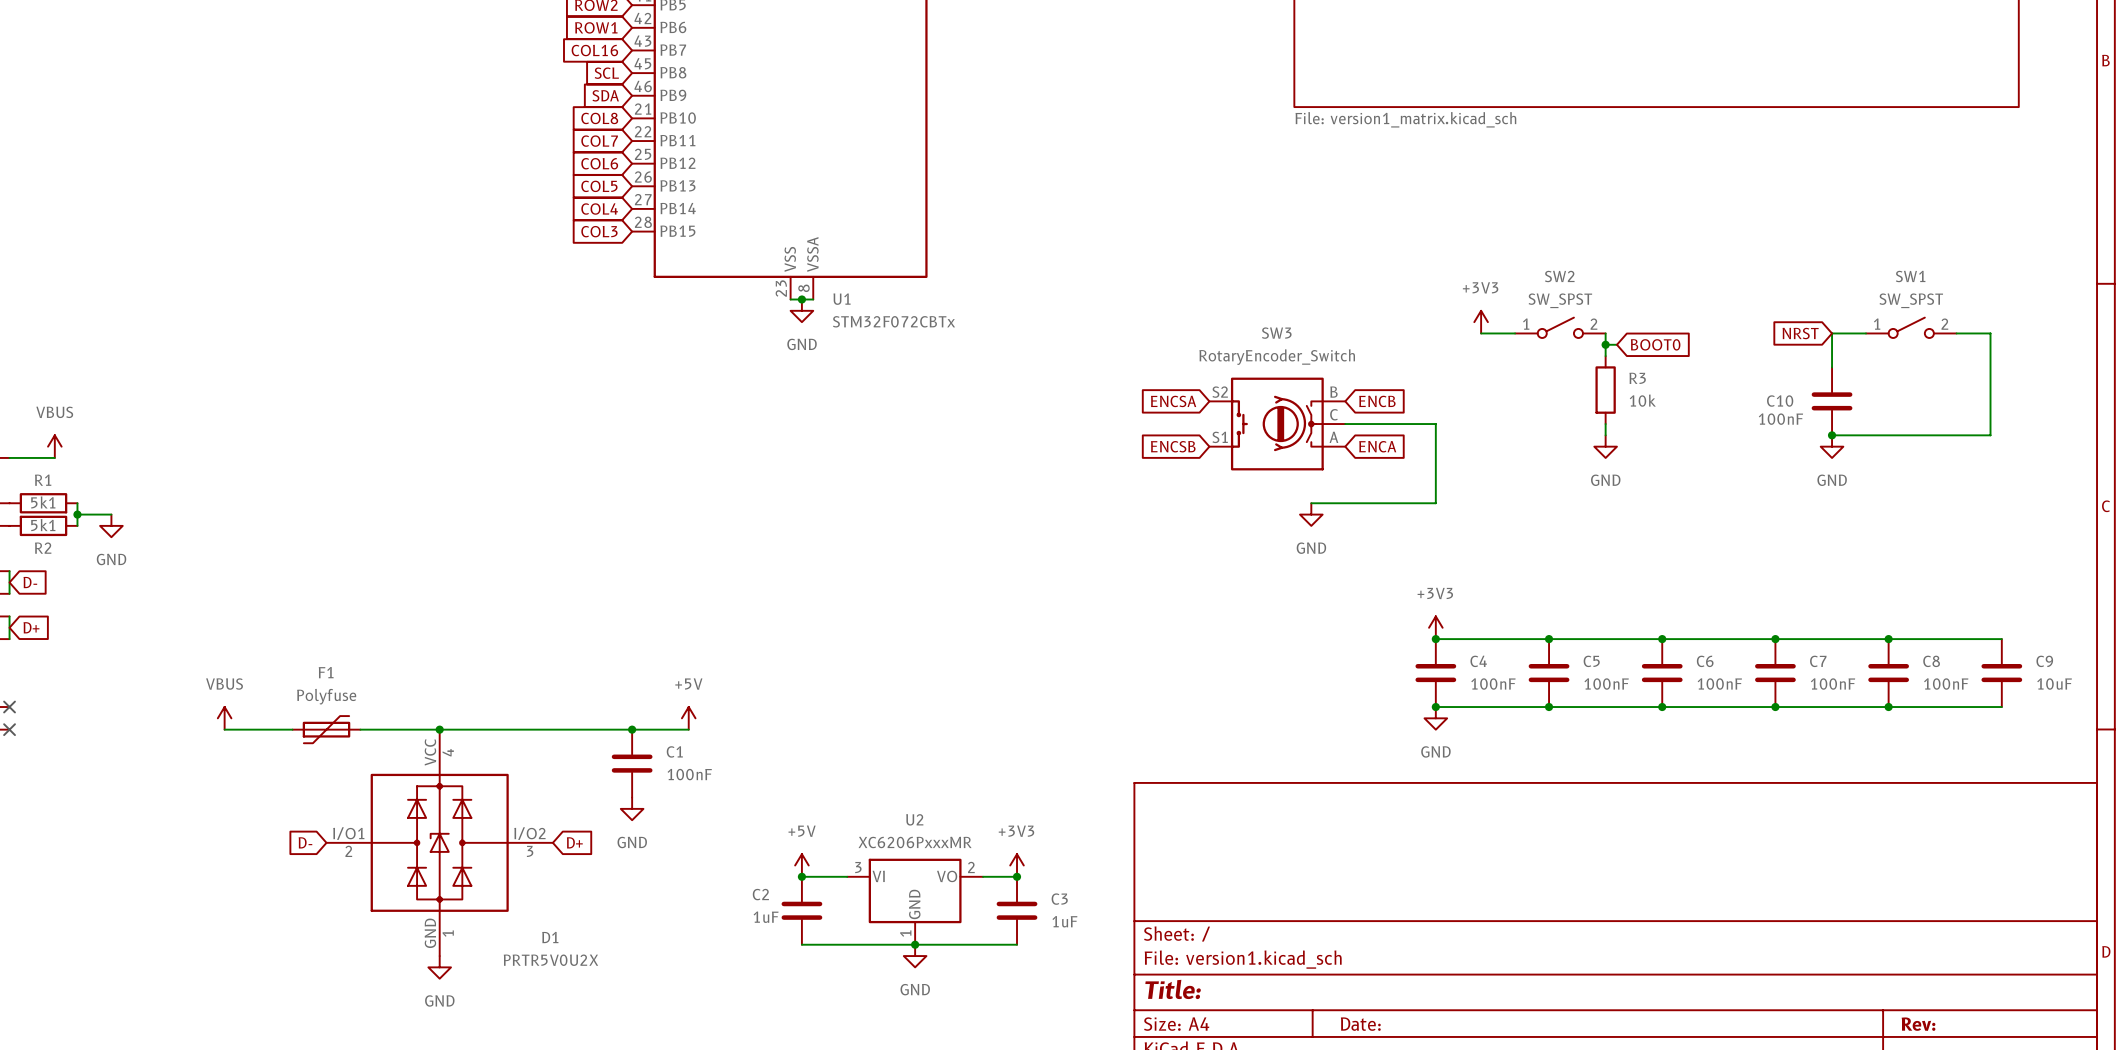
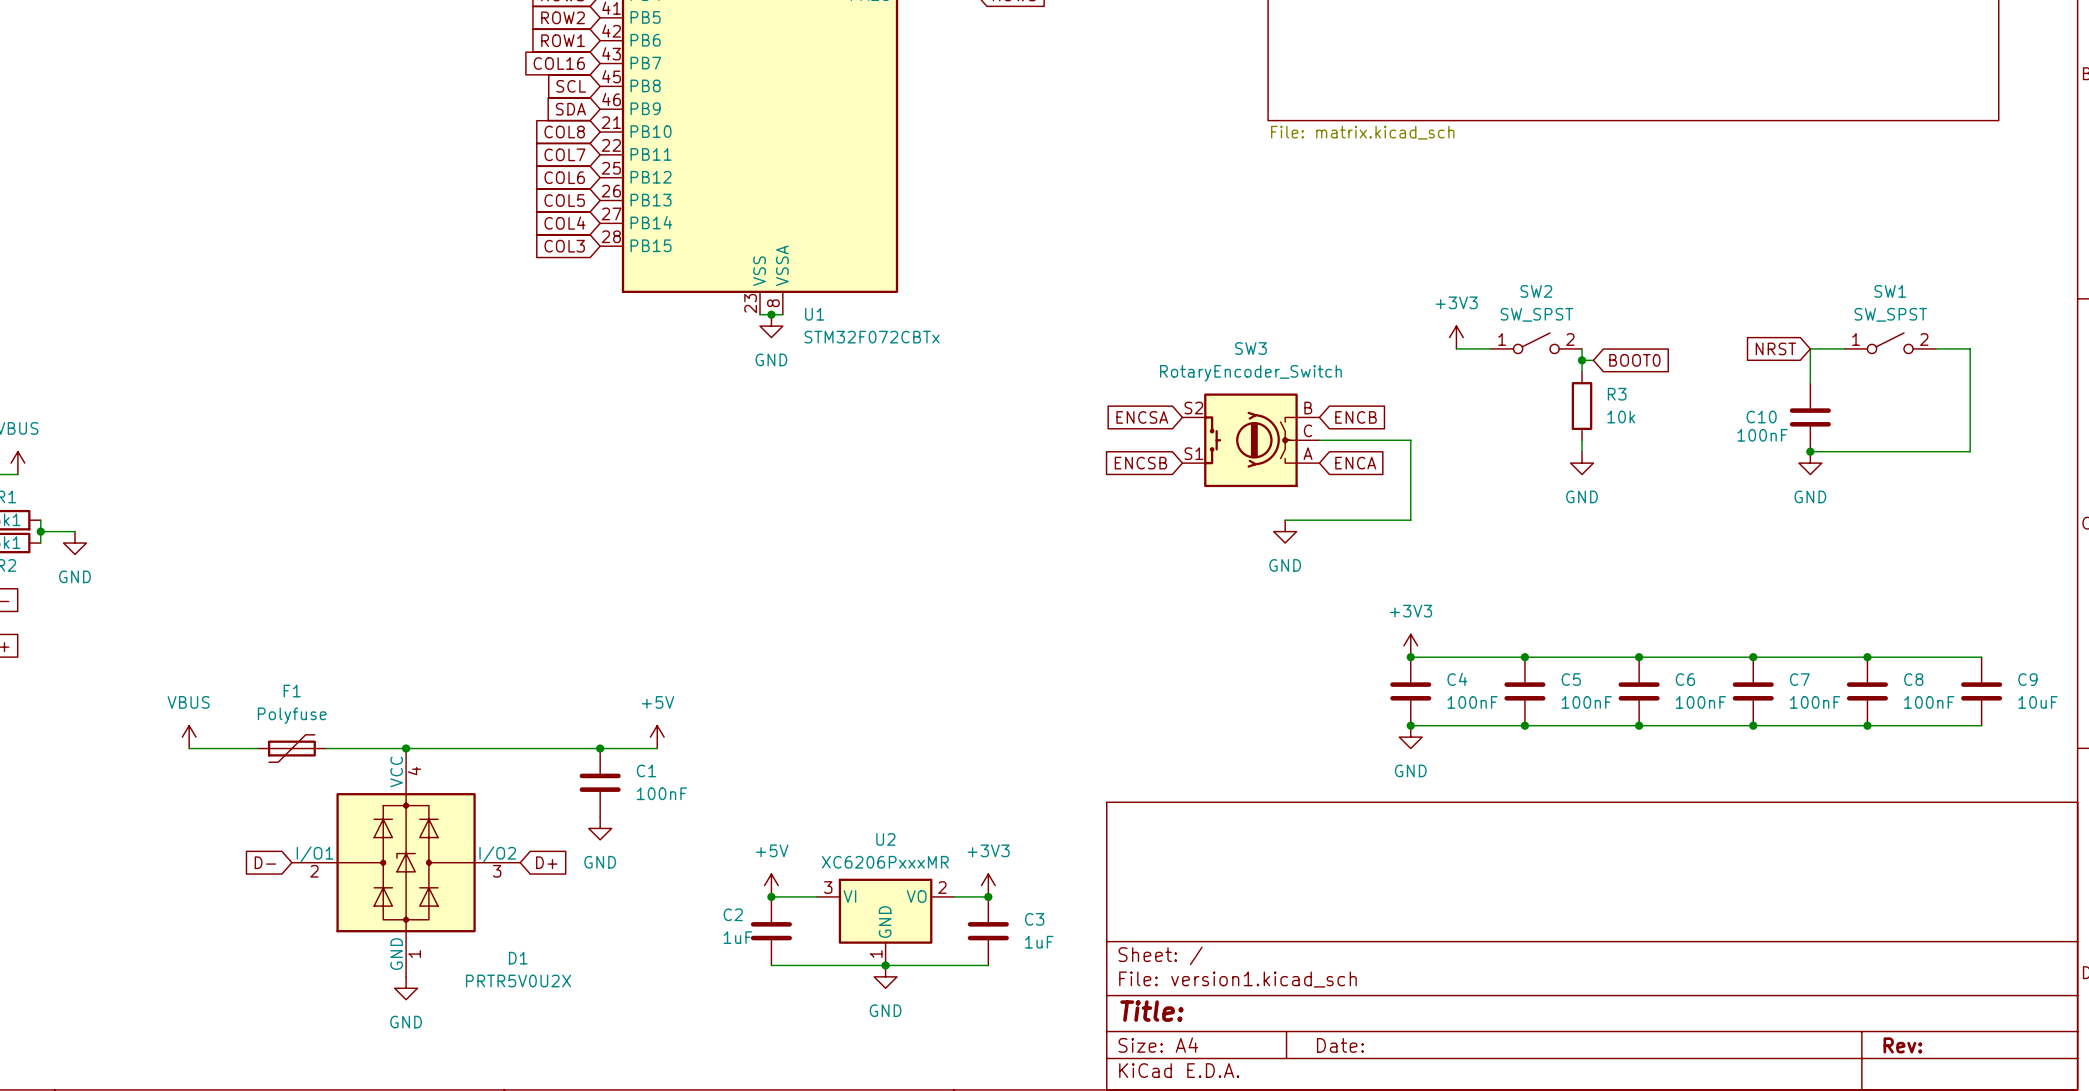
sheet value: File: version1_matrix.kicad_sch (1405, 119) -> File: matrix.kicad_sch (1362, 132)

